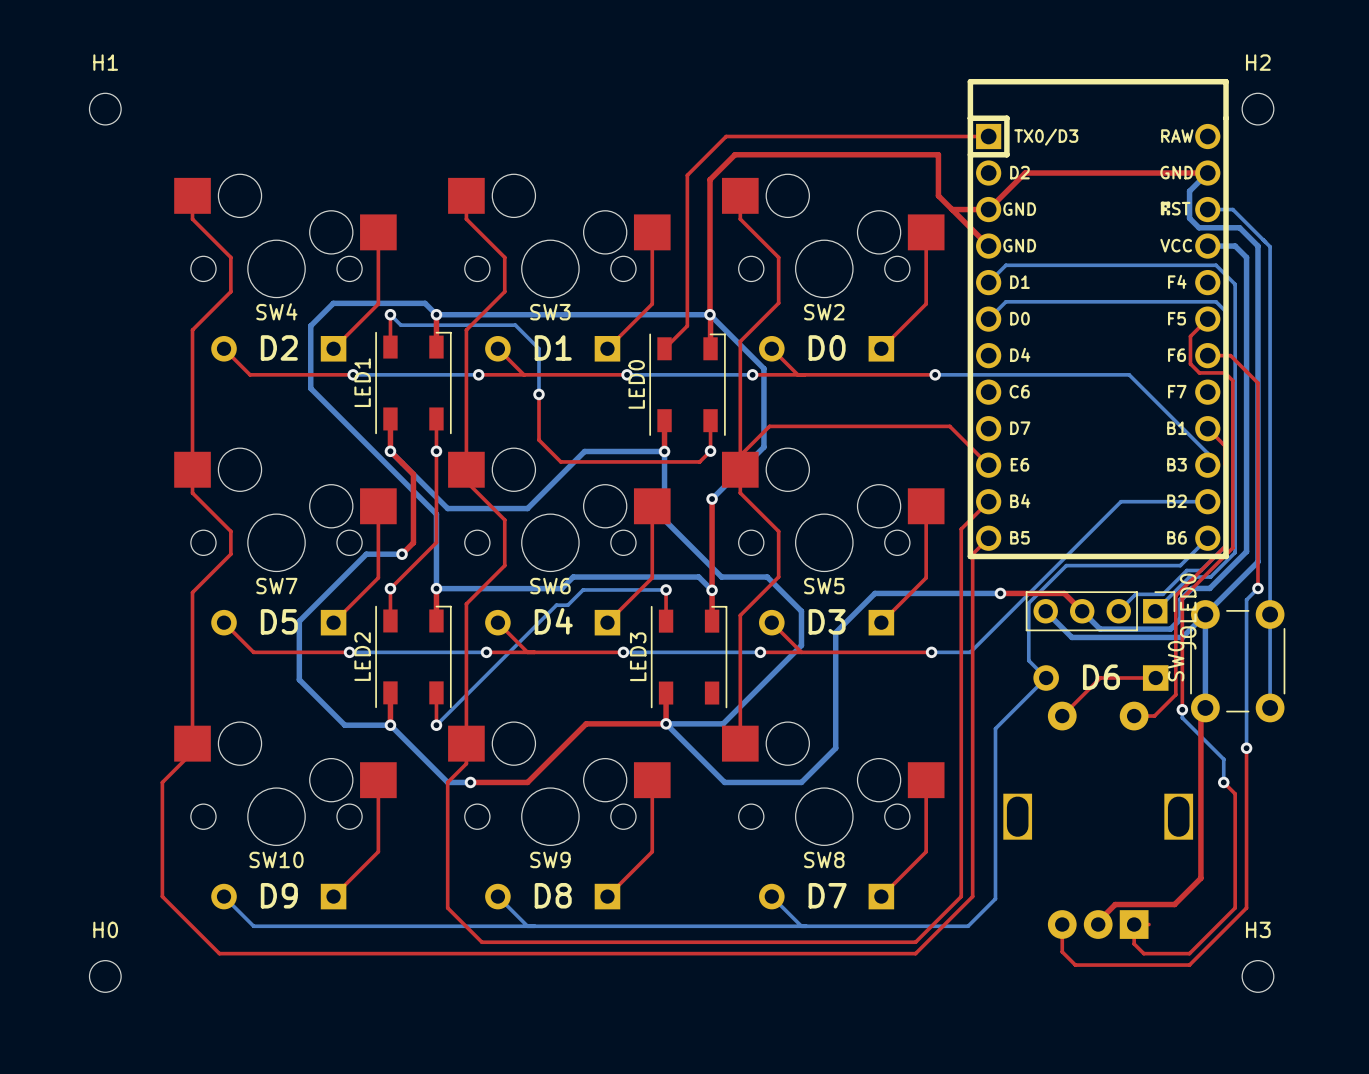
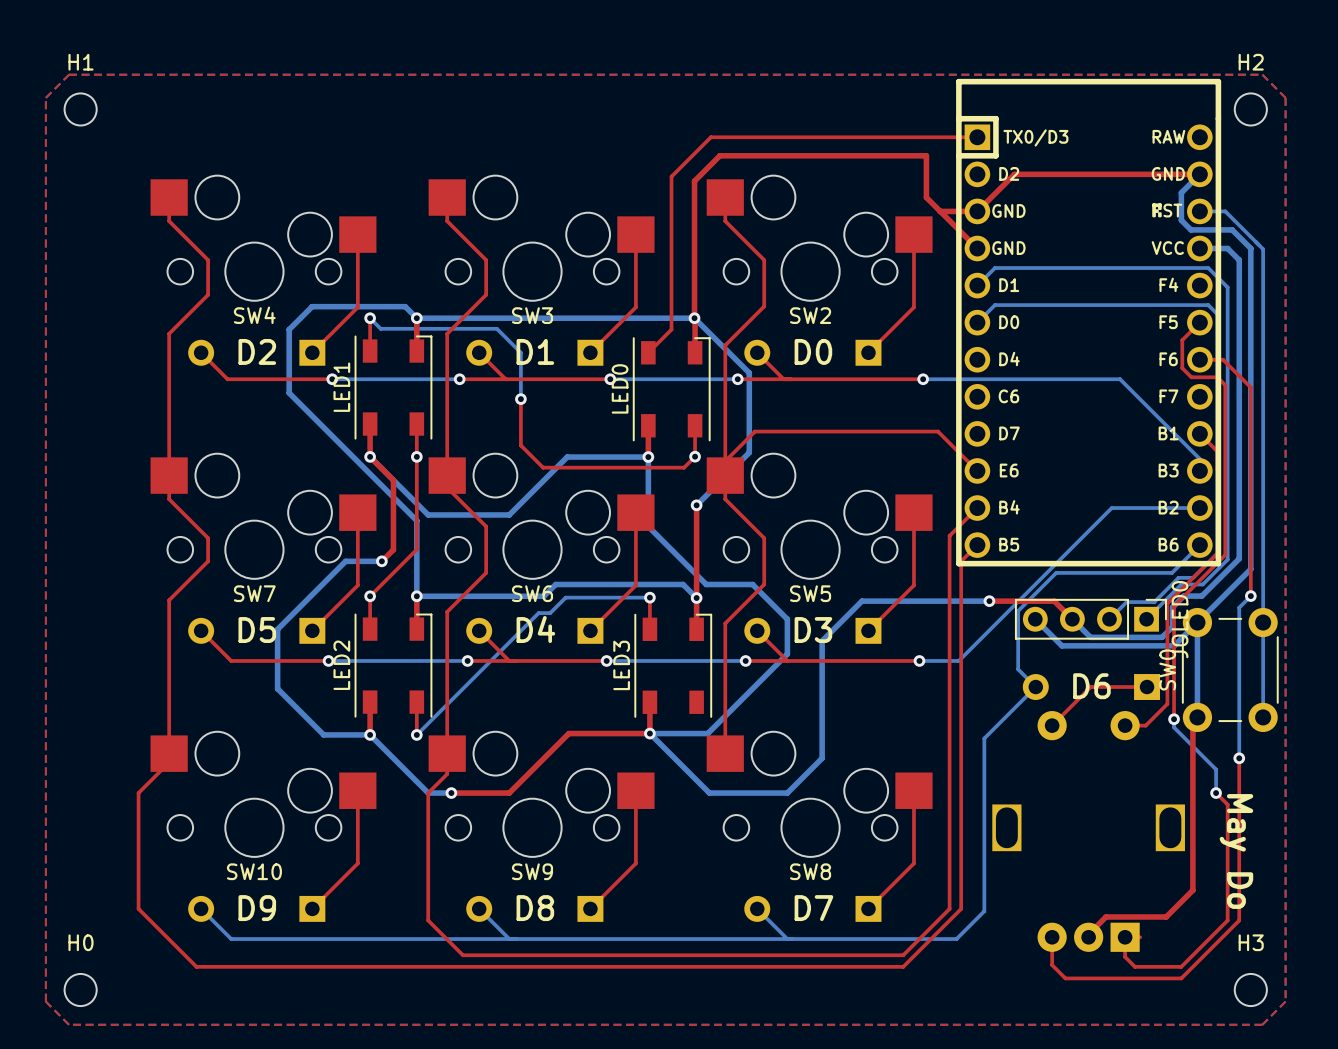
top zone outline: none -> (69, 74) (45, 97) (45, 1001) (69, 1024) (1262, 1024) (1285, 1001) (1285, 97) (1262, 74) (69, 74)
text: none -> May Do (1236, 851)

